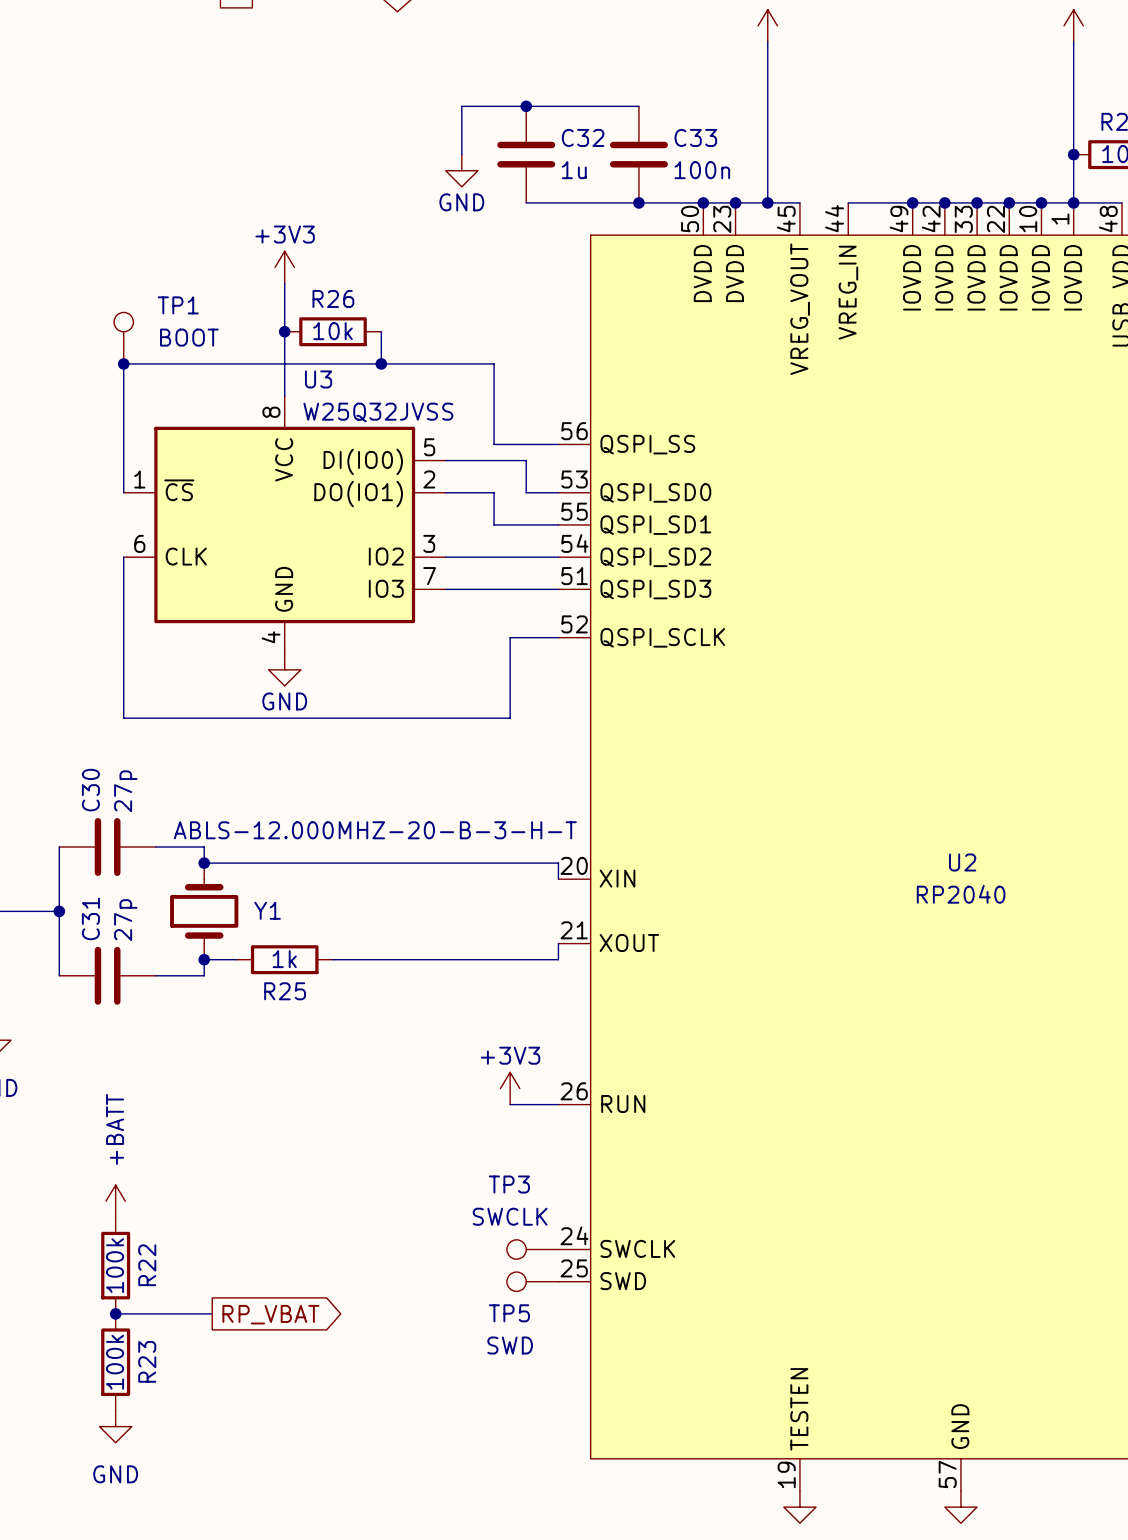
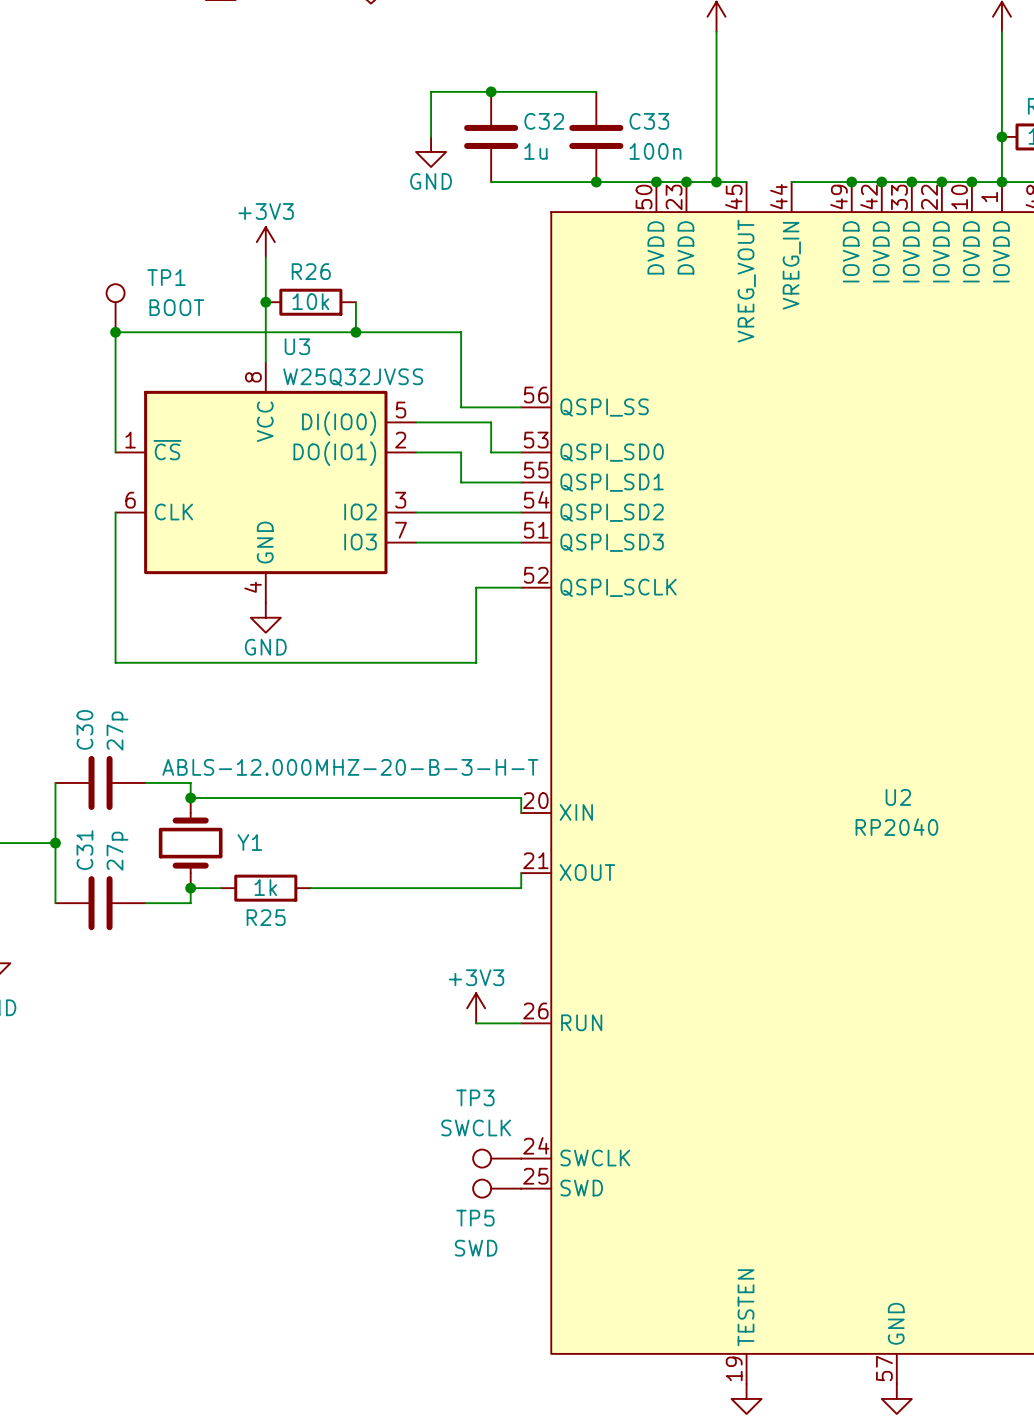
power symbol: +BATT (115, 1201) -> none
R22: 100k (115, 1265) -> none
wire: (115, 1313) (212, 1313) -> none
junction: (115, 1313) -> none
global label: RP_VBAT (270, 1314) -> none
R23: 100k (115, 1362) -> none
power symbol: GND (115, 1426) -> none

